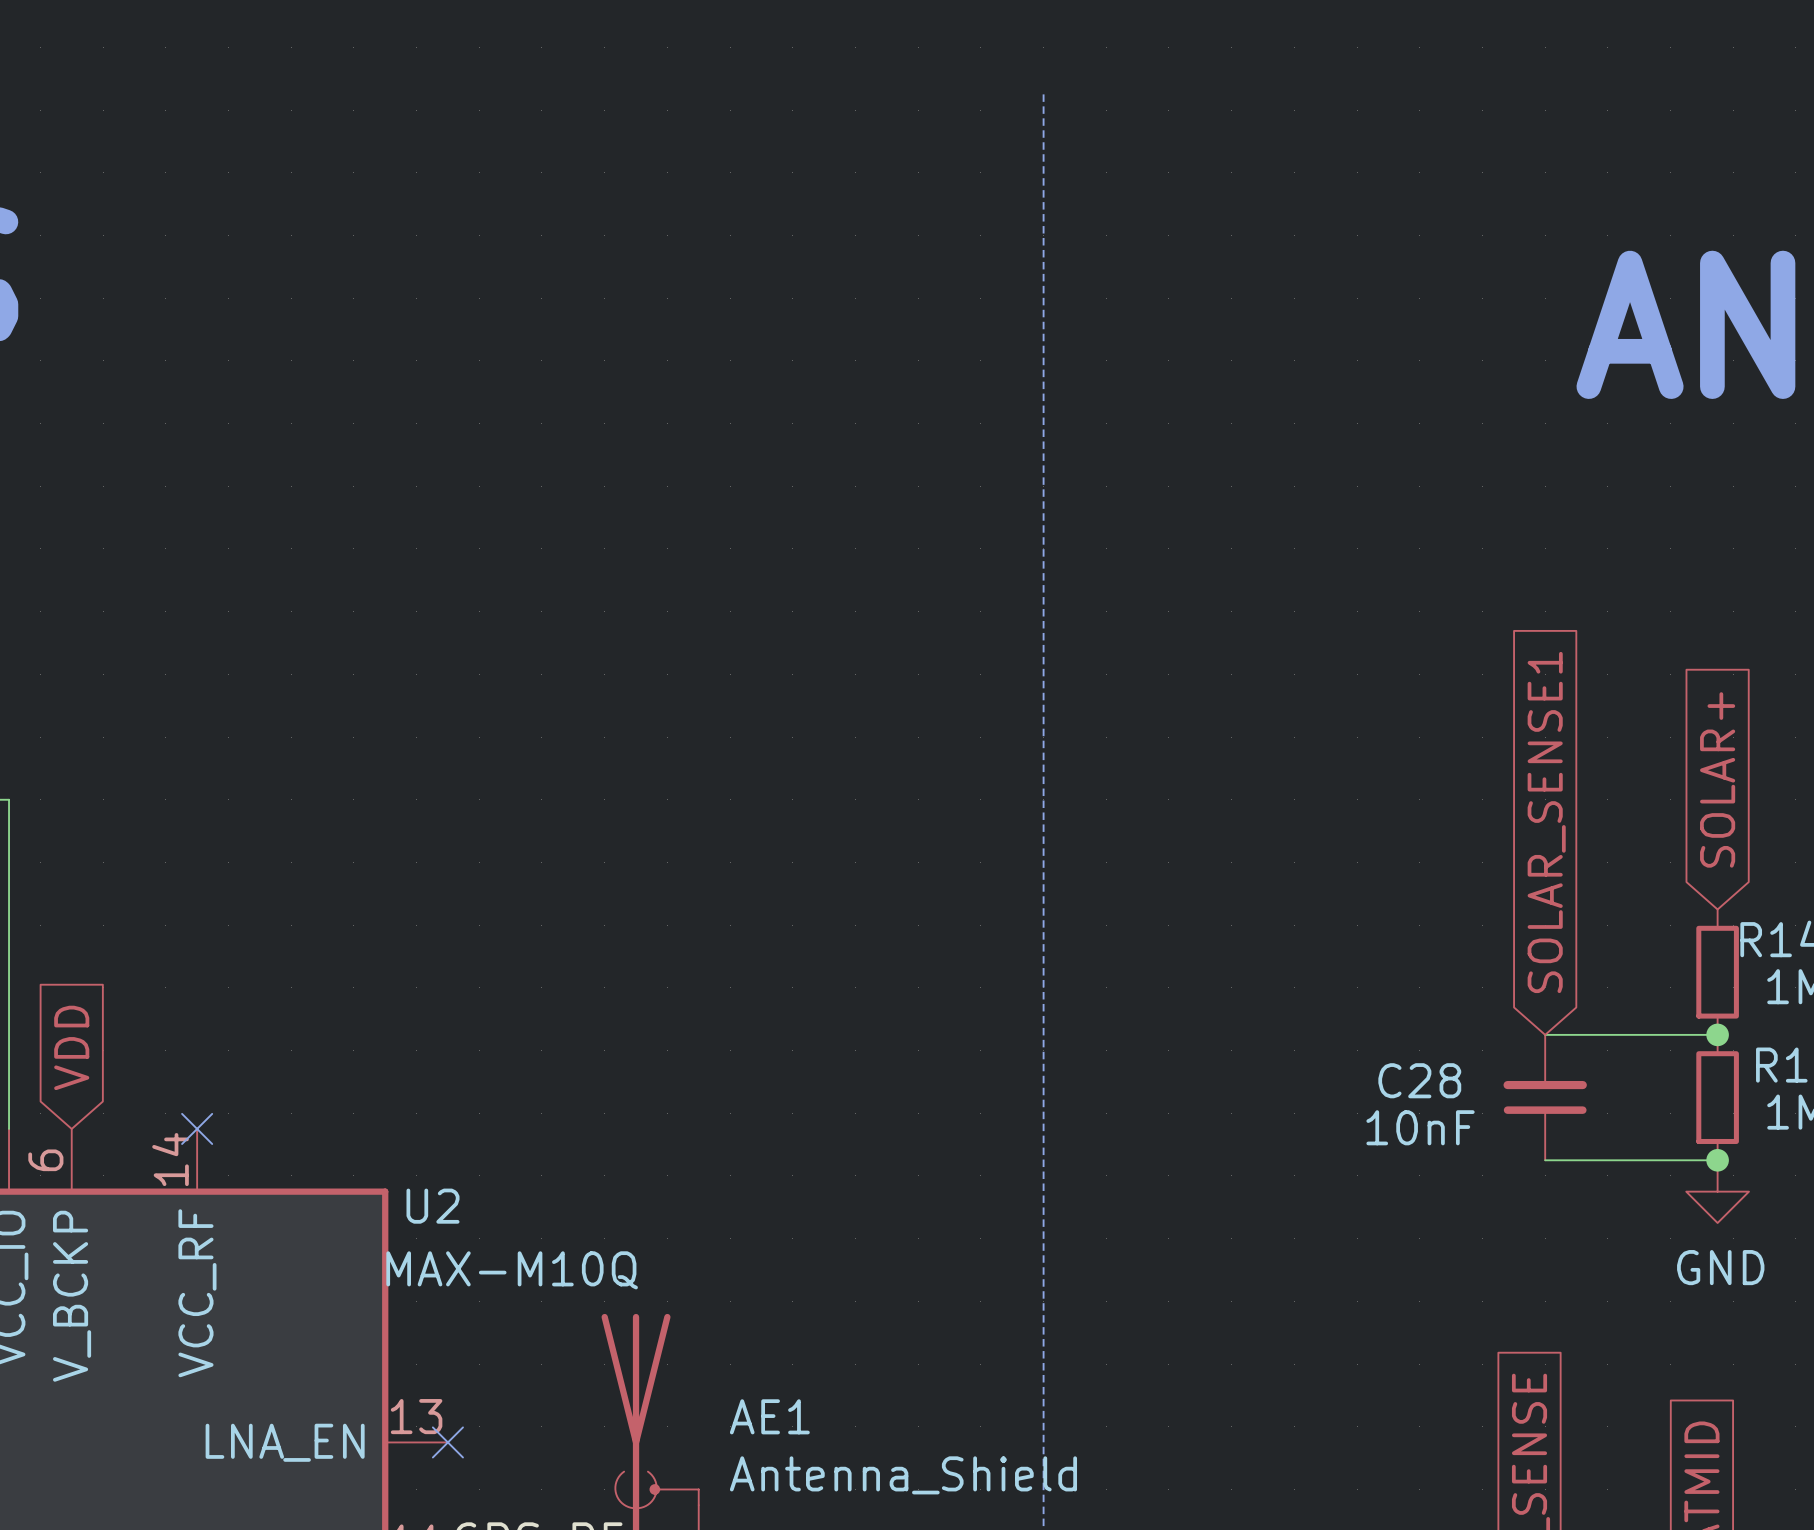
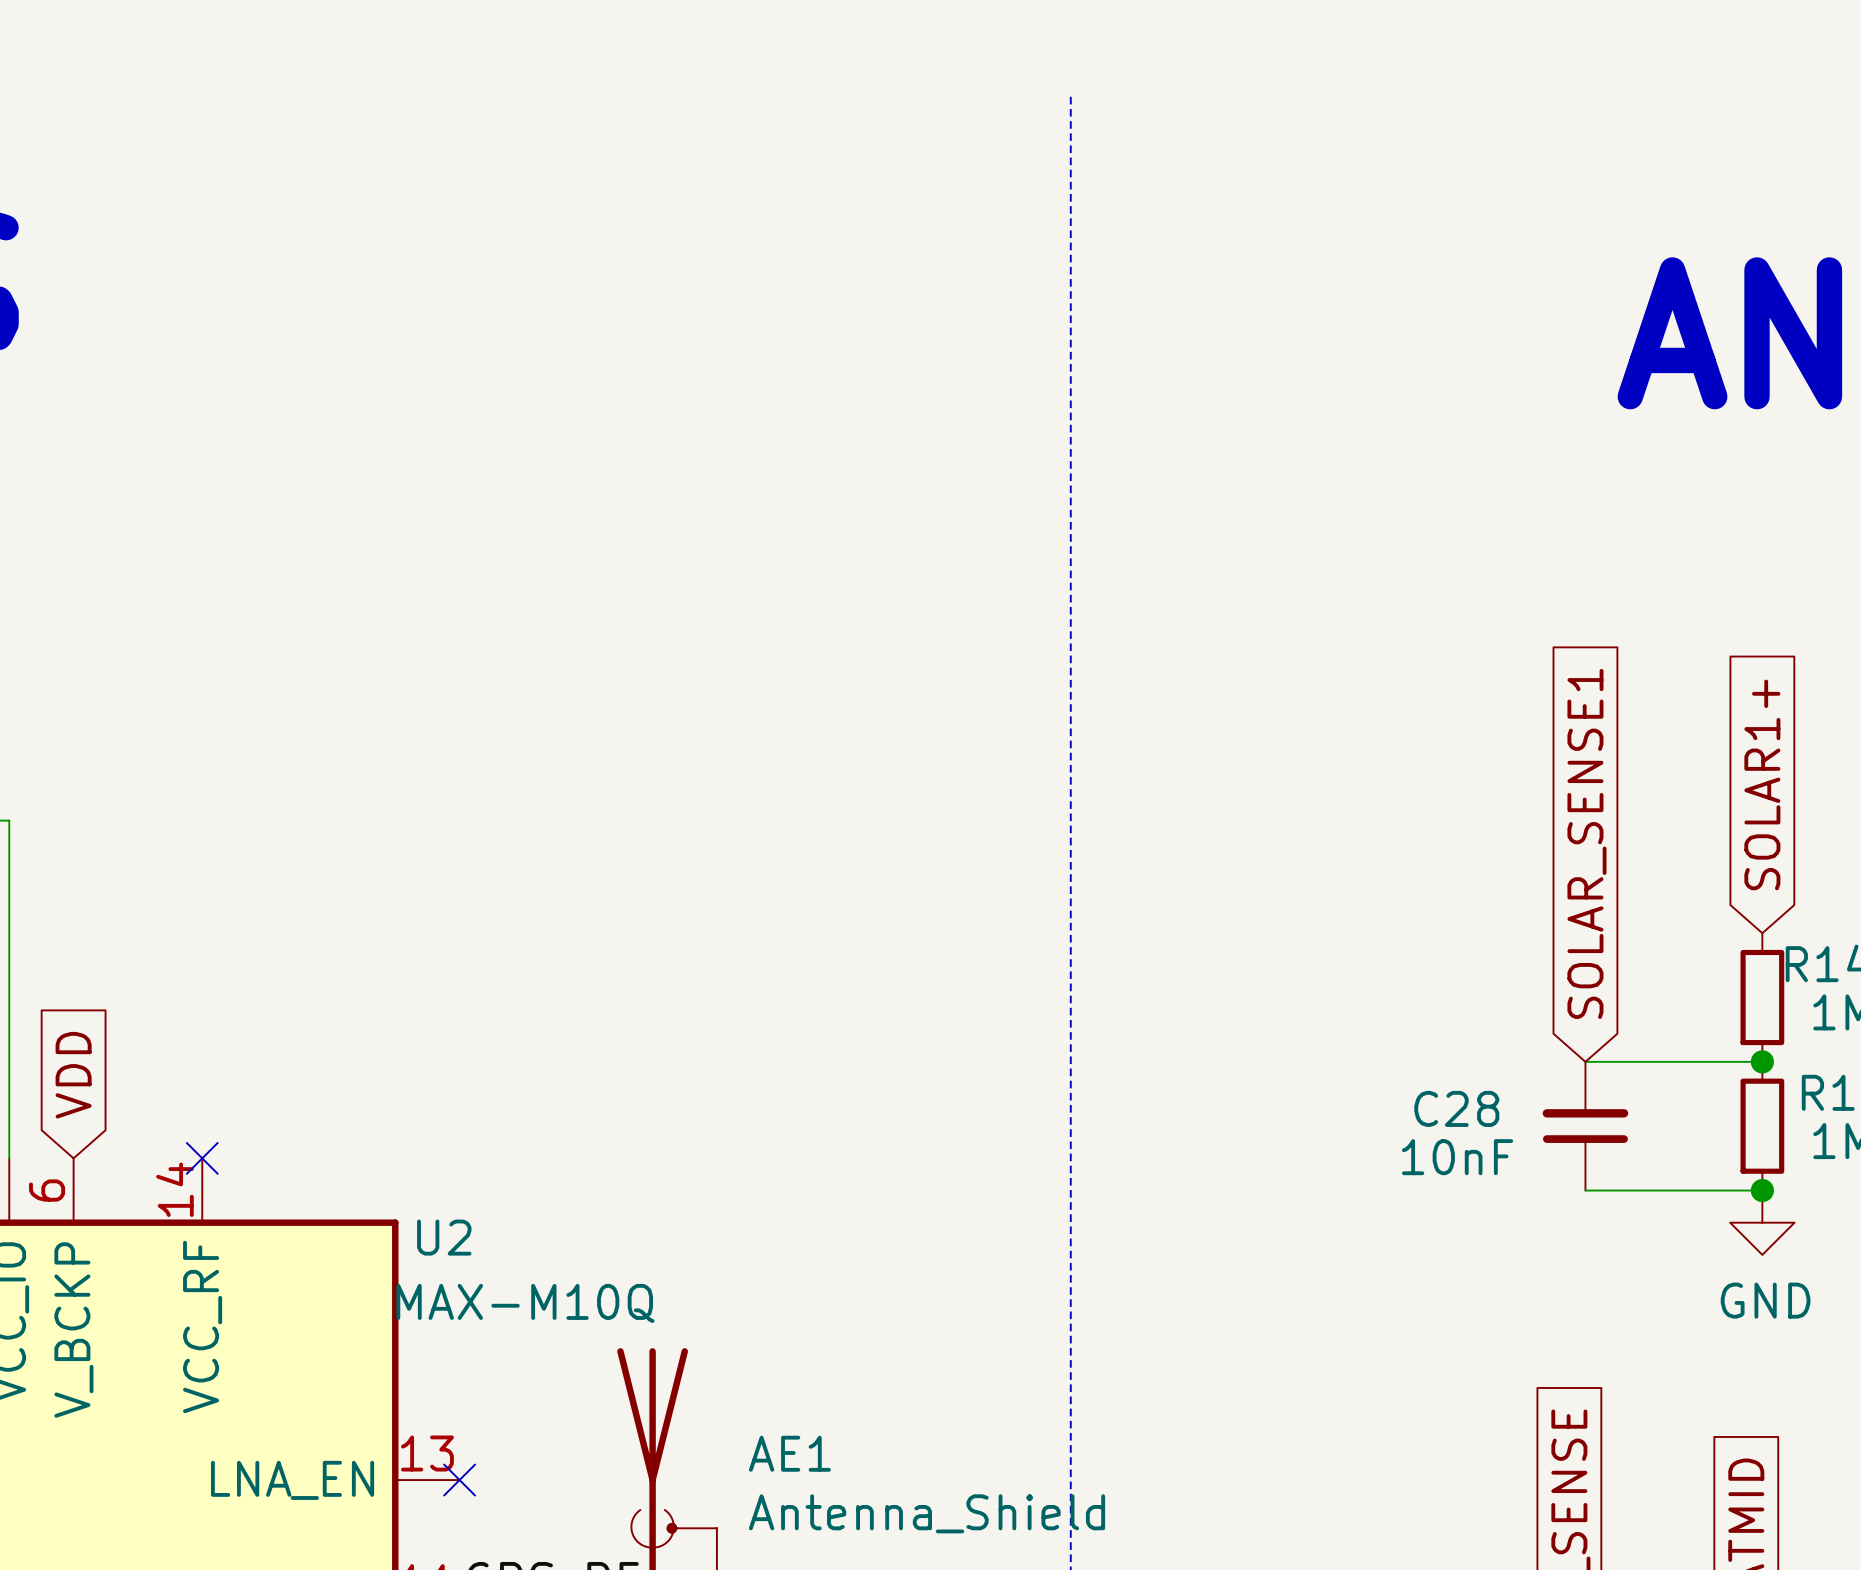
global label: SOLAR+ (1717, 779) -> SOLAR1+ (1762, 784)

